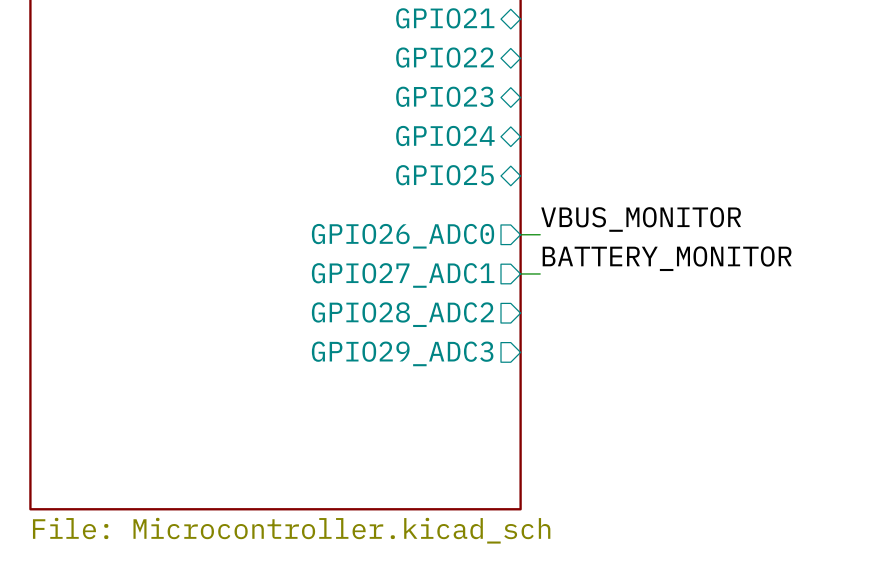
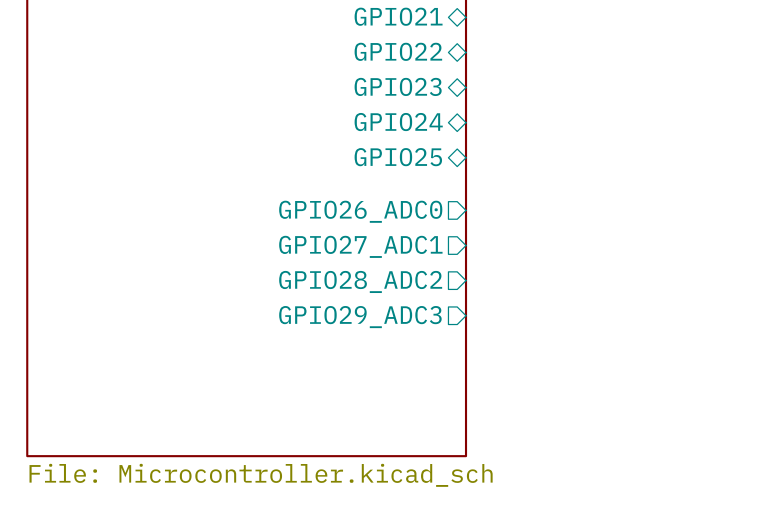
label: VBUS_MONITOR (641, 219) -> none
wire: (520, 234) (540, 234) -> none
label: BATTERY_MONITOR (667, 258) -> none
wire: (520, 273) (540, 273) -> none

